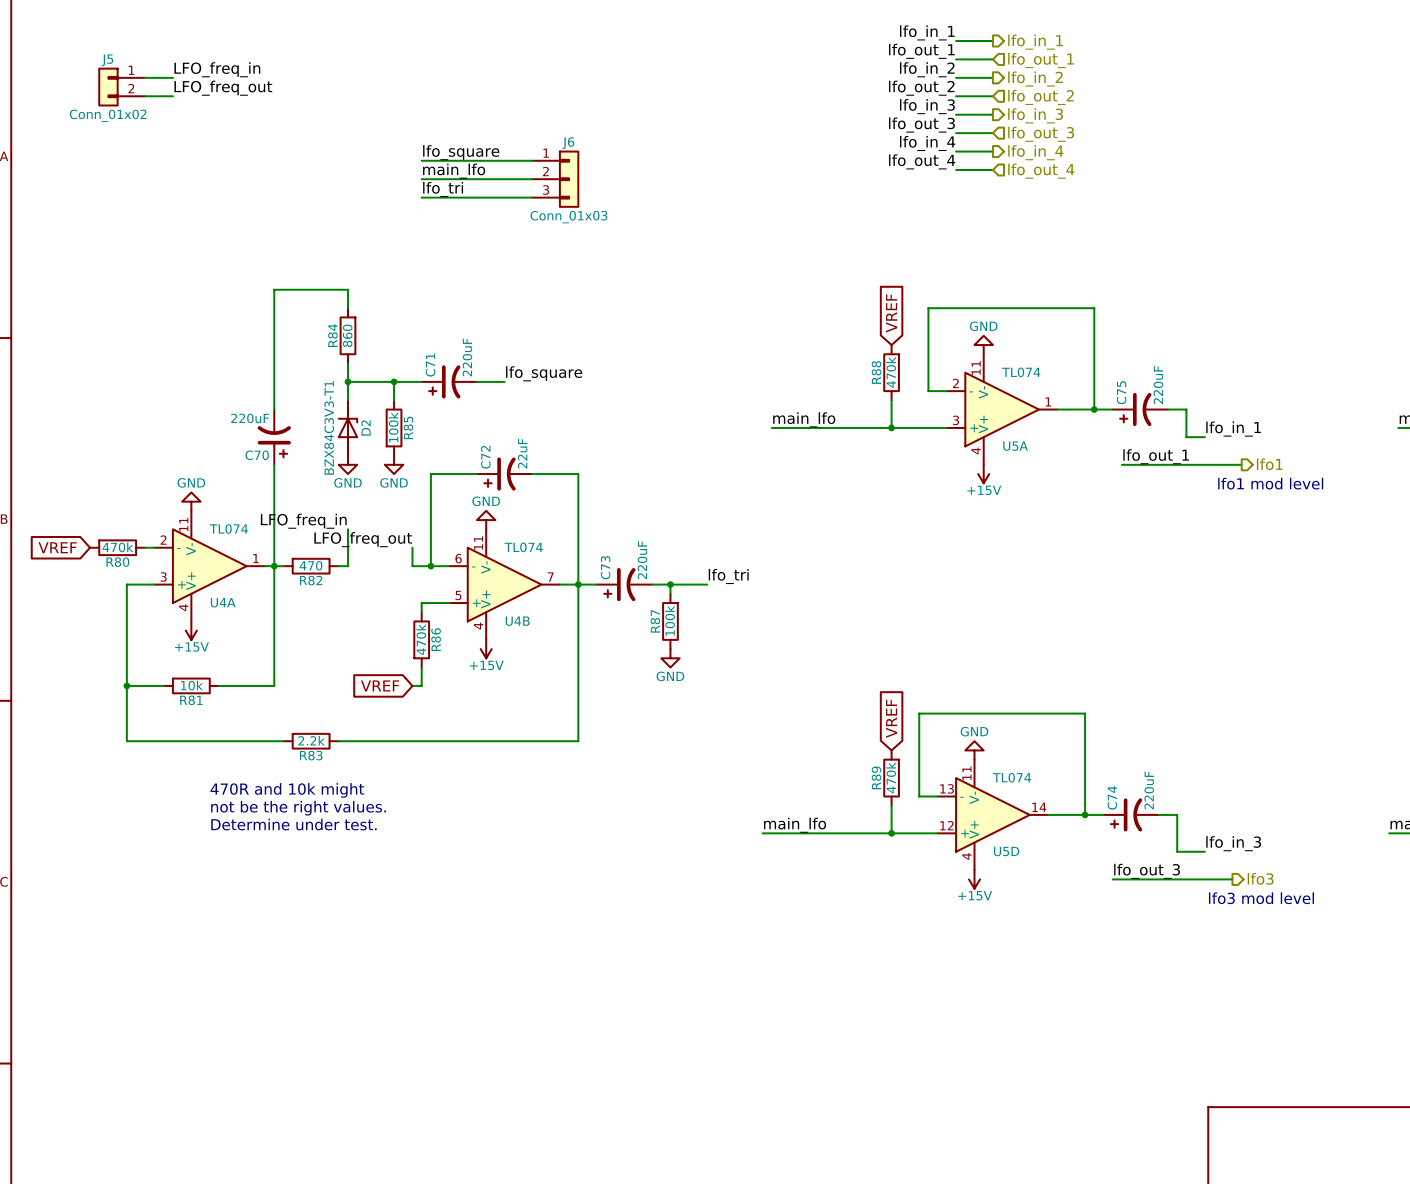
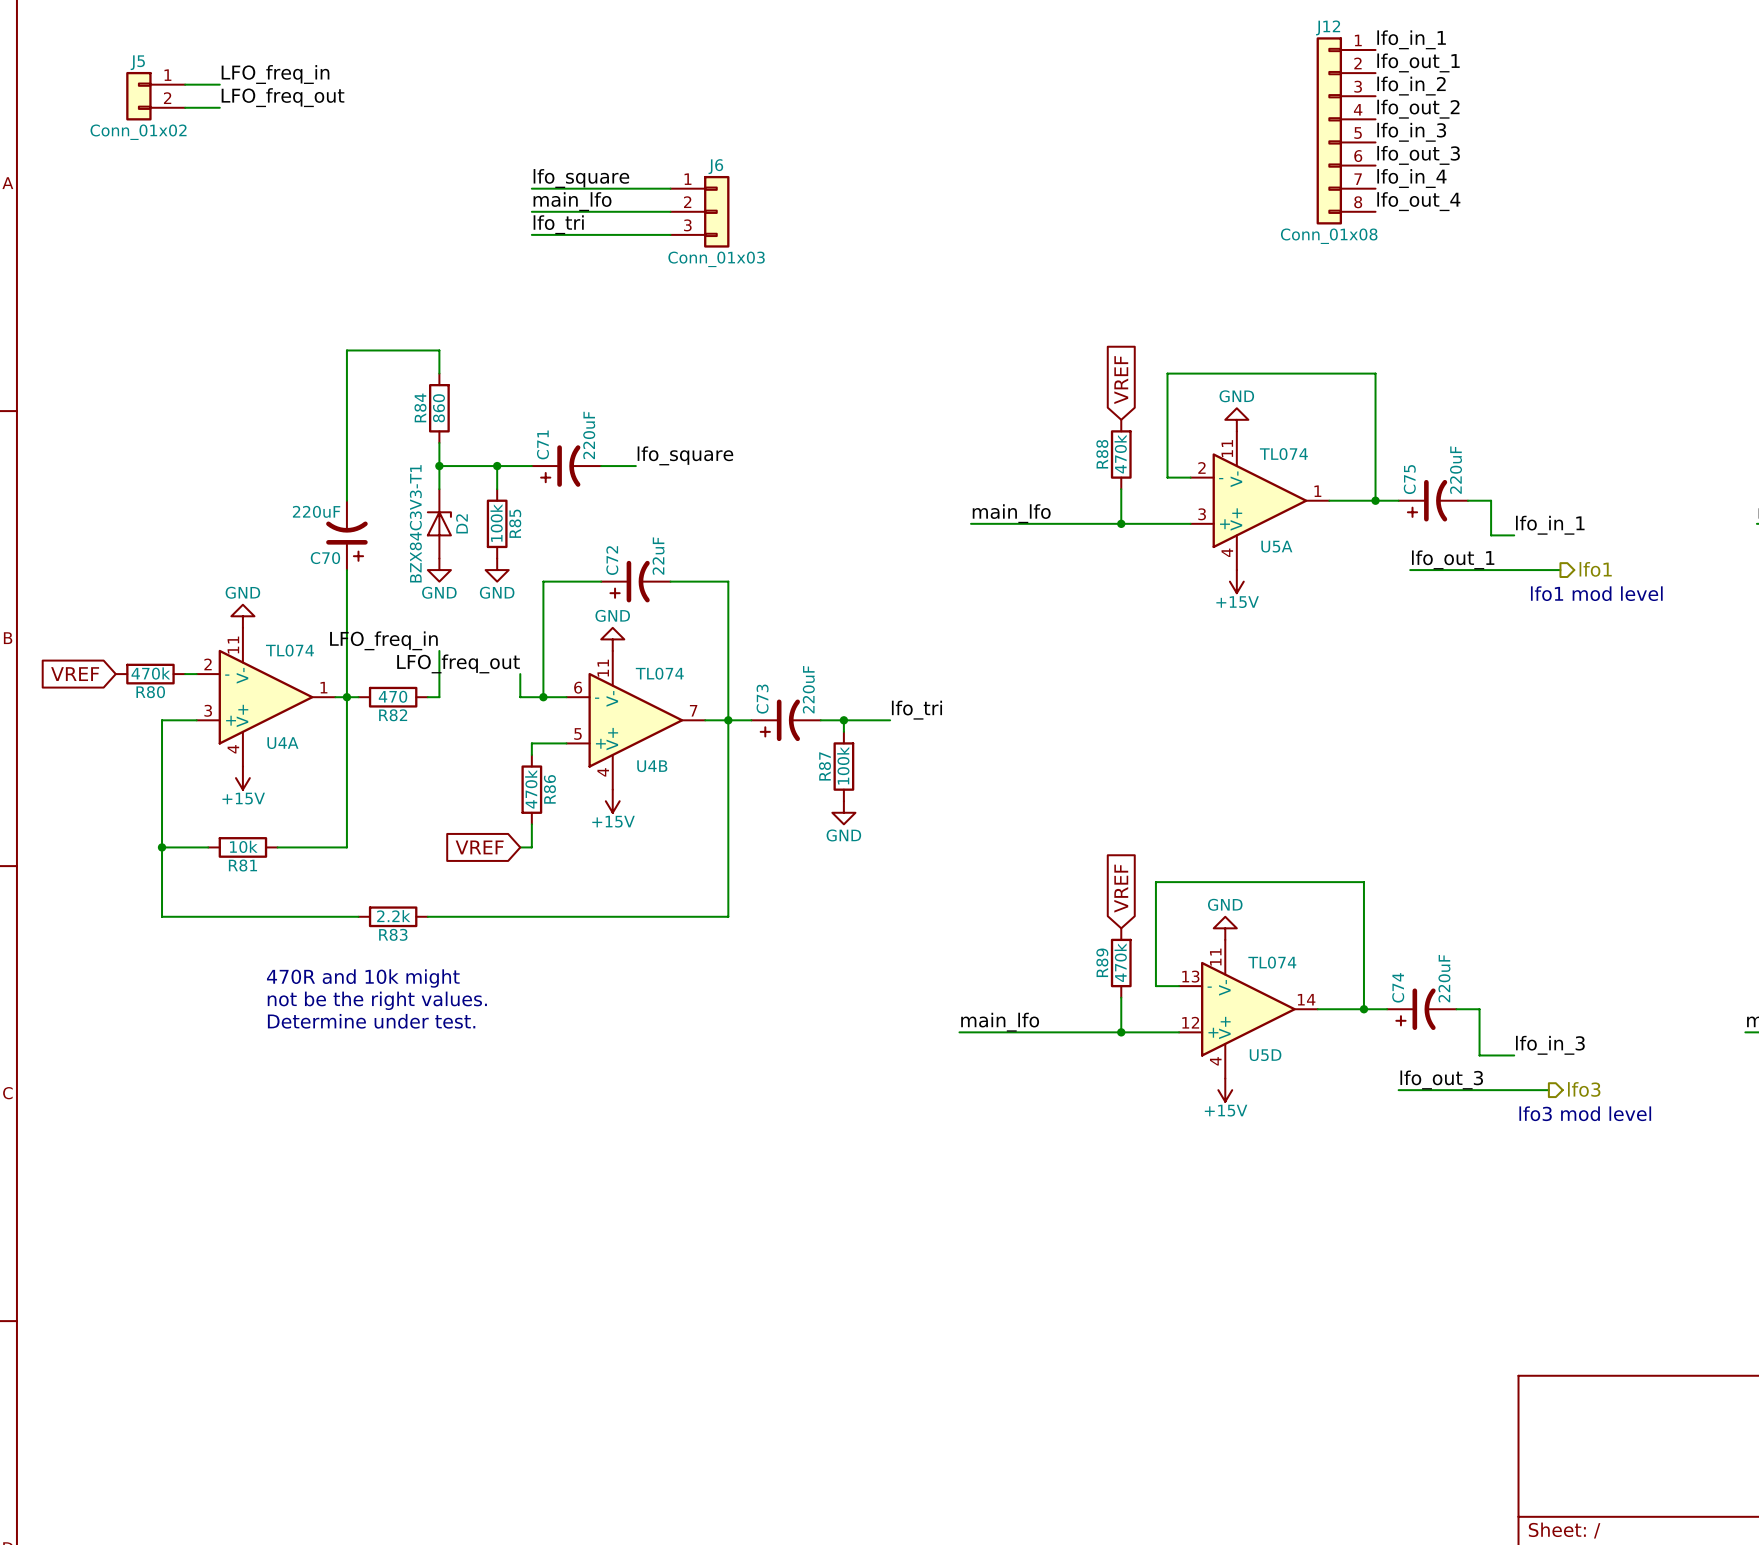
label position: lfo_in_1 (927, 32) -> lfo_in_1 (1411, 39)
wire: (956, 41) (992, 41) -> none
hierarchical label: lfo_in_1 (1035, 42) -> none
label position: lfo_out_1 (921, 51) -> lfo_out_1 (1418, 62)
wire: (956, 59) (992, 59) -> none
hierarchical label: lfo_out_1 (1041, 60) -> none
label position: lfo_in_2 (927, 69) -> lfo_in_2 (1411, 86)
wire: (956, 77) (992, 77) -> none
hierarchical label: lfo_in_2 (1035, 78) -> none
label position: lfo_out_2 (921, 88) -> lfo_out_2 (1418, 109)
wire: (956, 96) (992, 96) -> none
hierarchical label: lfo_out_2 (1040, 97) -> none
label position: lfo_in_3 (927, 106) -> lfo_in_3 (1411, 132)
wire: (956, 114) (992, 114) -> none
J12: none -> Conn_01x08 (1346, 130)
hierarchical label: lfo_in_3 (1035, 115) -> none
label position: lfo_out_3 (921, 125) -> lfo_out_3 (1418, 155)
wire: (956, 133) (992, 133) -> none
hierarchical label: lfo_out_3 (1041, 134) -> none
label position: lfo_in_4 (927, 143) -> lfo_in_4 (1411, 178)
wire: (956, 151) (992, 151) -> none
hierarchical label: lfo_in_4 (1035, 152) -> none
label position: lfo_out_4 (922, 161) -> lfo_out_4 (1418, 201)
wire: (956, 169) (992, 169) -> none
hierarchical label: lfo_out_4 (1041, 171) -> none

